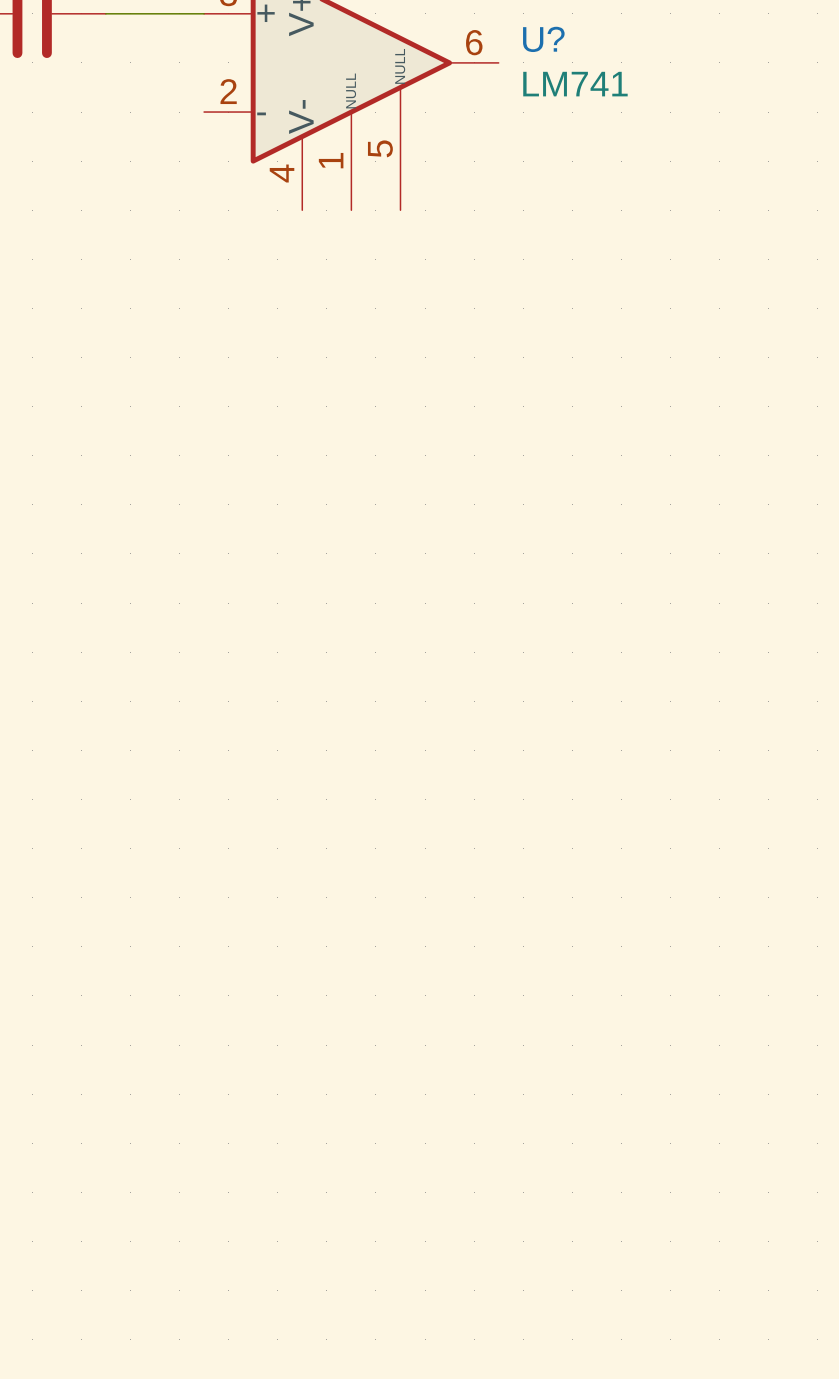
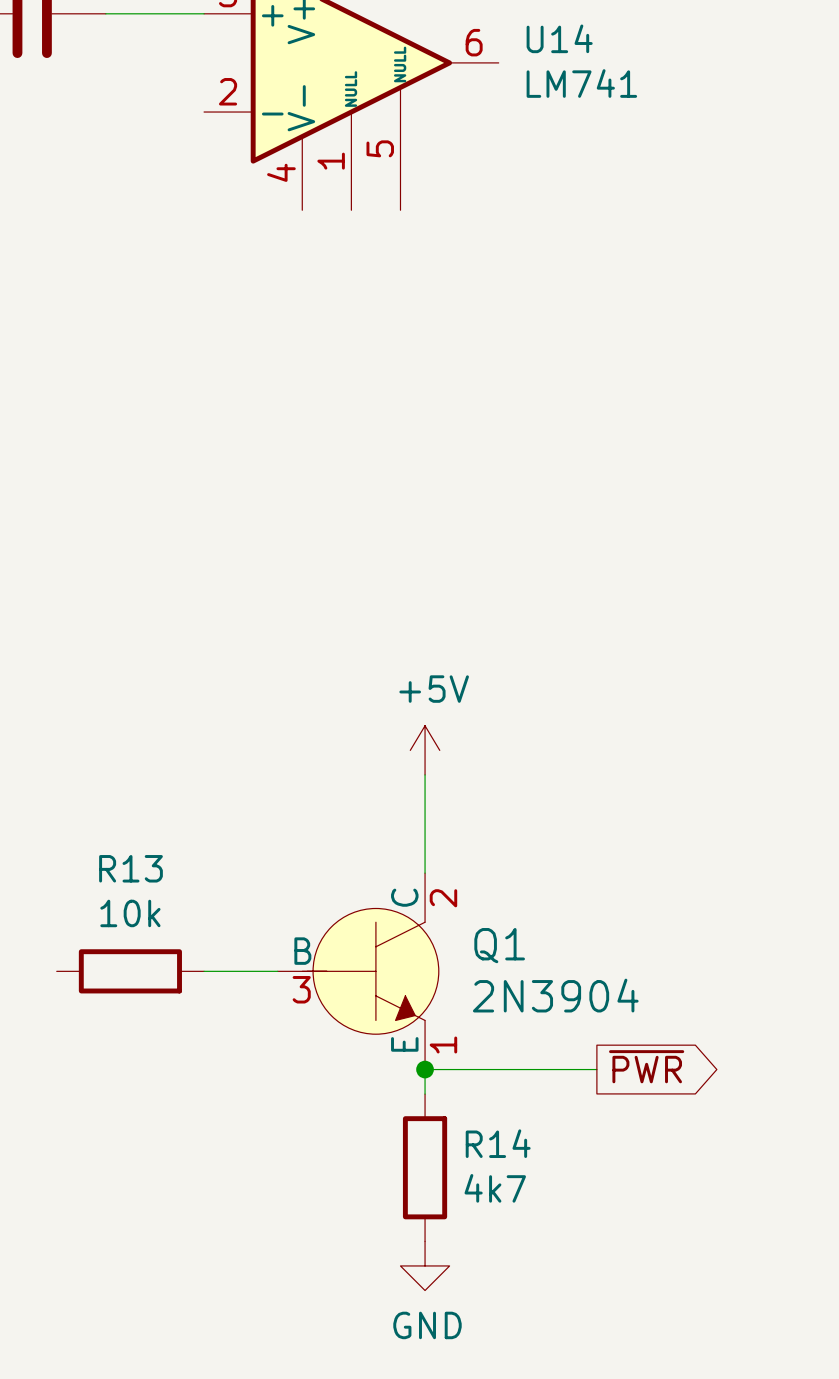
U? name: U? (543, 39) -> U14 (559, 38)
power symbol: none -> +5V (425, 750)
wire: none -> (425, 774) (425, 873)
R13: none -> 10k (130, 971)
wire: none -> (204, 971) (277, 971)
Q1: none -> 2N3904 (358, 971)
global label: none -> ~{PWR} (646, 1066)
junction: none -> (425, 1069)
wire: none -> (596, 1069) (425, 1069) (425, 1094)
R14: none -> 4k7 (425, 1167)
power symbol: none -> GND (425, 1265)

